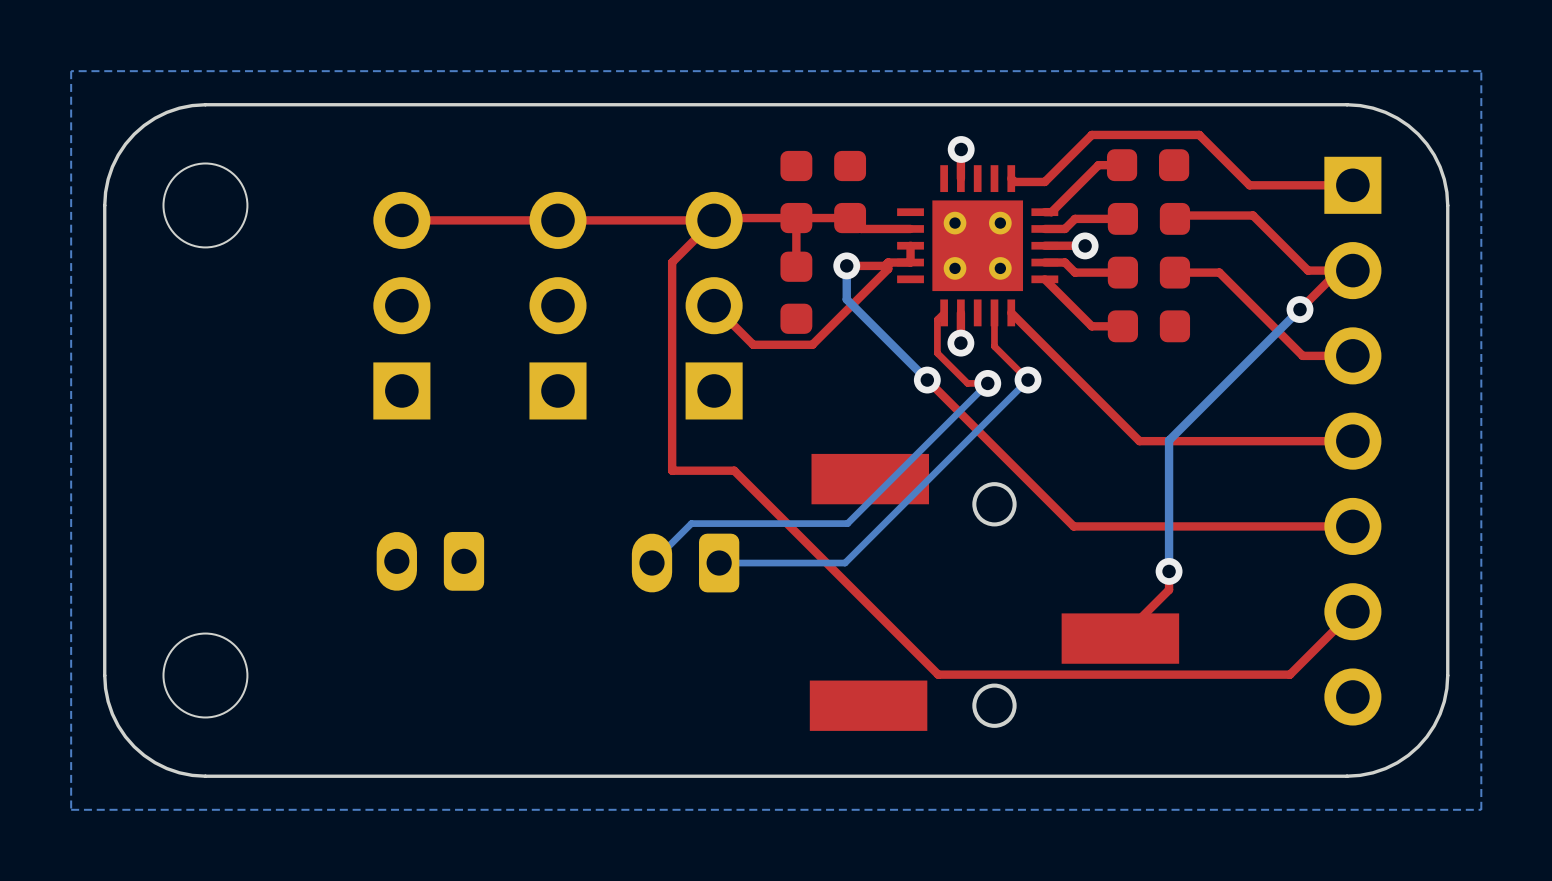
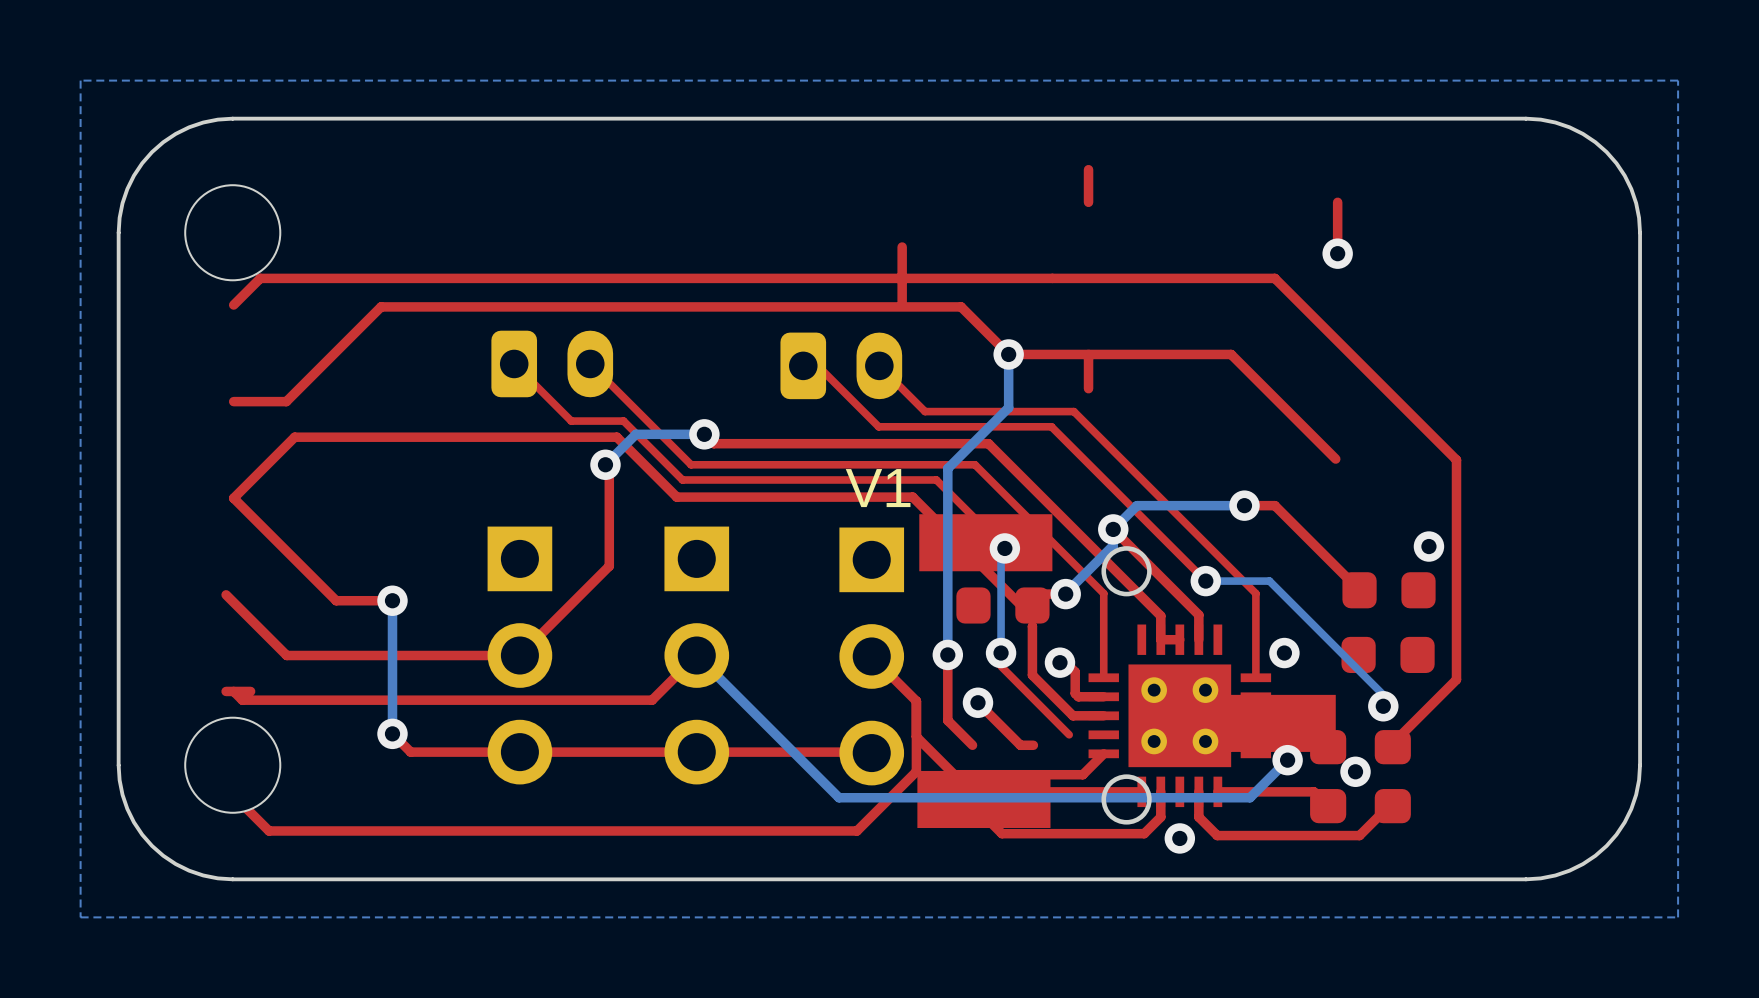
via: (961, 149) -> none
top track: (1122, 165) (1098, 165) (1051, 212) (1044, 212) -> none
part: (1148, 165) -> none
top track: (1011, 178) (1014, 181) (1044, 181) (1091, 134) (1199, 134) (1249, 185) (1352, 185) -> none
top track: none -> (1337, 202) (1337, 253)
part: (796, 192) -> none
part: (850, 192) -> none
top track: (1122, 218) (1075, 218) (1064, 228) (1044, 228) -> none
part: (1148, 218) -> none
top track: (1174, 218) (1178, 215) (1253, 215) (1308, 270) (1352, 270) -> none
top track: (714, 220) (401, 220) -> none
via: none -> (1337, 253)
top track: (910, 228) (861, 228) (850, 218) (716, 218) (672, 262) (672, 470) (734, 470) (938, 674) (1289, 674) (1352, 611) -> none
top track: (910, 245) (910, 262) (888, 262) -> none
part position: (977, 245) -> (1179, 715)
top track: none -> (1183, 278) (260, 278) (233, 305)
top track: none -> (1229, 278) (1274, 278) (1456, 460) (1456, 679) (1389, 747)
via: (1085, 245) -> none
top track: (888, 262) (884, 265) (846, 265) -> none
top track: (888, 262) (888, 268) (812, 344) (753, 344) (714, 305) -> none
top track: (1044, 262) (1064, 262) (1075, 272) (1122, 272) -> none
bottom track: (846, 265) (846, 299) (927, 380) -> none
via: (846, 265) -> none
top track: (1338, 270) (1300, 309) -> none
part: (1148, 272) -> none
top track: (1174, 272) (1219, 272) (1302, 355) (1352, 355) -> none
top track: (1044, 279) (1091, 326) (1122, 326) -> none
part: (796, 292) -> none
part: (401, 305) -> none
part: (558, 305) -> none
part: (714, 305) -> none
bottom track: (1300, 309) (1169, 440) (1169, 571) -> none
via: (1300, 309) -> none
bottom track: none -> (1008, 354) (1008, 407) (947, 468) (947, 654)
via: none -> (1008, 354)
top track: (944, 312) (937, 319) (937, 353) (967, 383) (987, 383) -> none
top track: (994, 312) (994, 346) (1028, 380) -> none
top track: (1011, 312) (1139, 441) (1352, 441) -> none
top track: none -> (514, 363) (571, 421) (623, 421) (682, 479) (936, 479) (1004, 548)
part: none -> (552, 363)
top track: none -> (590, 363) (691, 464) (974, 464) (1103, 593) (1103, 677)
top track: none -> (803, 365) (817, 365) (878, 426) (1051, 426) (1205, 581)
part: none -> (841, 365)
top track: none -> (879, 365) (925, 411) (1073, 411) (1255, 593) (1255, 677)
part: (1148, 326) -> none
via: (960, 343) -> none
top track: none -> (233, 401) (286, 401) (381, 306) (961, 306) (1008, 354) (1231, 354) (1335, 459)
top track: (927, 380) (1073, 526) (1352, 526) -> none
via: (927, 380) -> none
bottom track: (1028, 380) (845, 563) (719, 563) -> none
via: (1028, 380) -> none
top track: none -> (704, 434) (713, 443) (988, 443) (1160, 615) (1160, 639) (1179, 639)
bottom track: none -> (704, 434) (635, 434) (605, 464)
via: none -> (704, 434)
bottom track: (987, 383) (887, 484) -> none
via: (987, 383) -> none
top track: none -> (605, 464) (609, 468) (609, 566) (519, 655) (286, 655) (226, 594)
via: none -> (605, 464)
text: none -> V1 (878, 488)
part: (1352, 441) -> none
top track: none -> (1244, 505) (1274, 505) (1359, 590)
bottom track: none -> (1244, 505) (1137, 505) (1113, 529) (1113, 545) (1065, 594)
via: none -> (1244, 505)
top track: none -> (1113, 529) (1198, 615) (1198, 639)
via: none -> (1113, 529)
via: none -> (1428, 546)
via: none -> (1004, 548)
bottom track: (883, 487) (847, 523) (691, 523) (652, 563) -> (1001, 552) (1001, 653)
bottom track: none -> (1205, 581) (1269, 581) (1383, 694) (1383, 706)
via: none -> (1205, 581)
part: none -> (1389, 590)
top track: none -> (1065, 594) (1043, 594) (1032, 605) (1021, 605) (912, 497) (676, 497) (616, 437) (294, 437) (233, 498) (336, 600) (392, 600)
via: none -> (1065, 594)
bottom track: none -> (392, 600) (392, 733)
via: none -> (392, 600)
part footprint: [376, 531, 485, 591] -> [487, 526, 553, 785]
part: none -> (1002, 605)
top track: none -> (1032, 626) (1032, 675) (1073, 715) (1103, 715)
part: (685, 563) -> none
top track: (1169, 571) (1169, 589) (1120, 638) -> none
via position: (1169, 571) -> (1284, 653)
via: none -> (1001, 653)
top track: none -> (696, 655) (652, 700) (242, 700) (233, 691)
bottom track: none -> (696, 655) (839, 797) (1250, 797) (1287, 760)
part: none -> (696, 655)
top track: none -> (947, 654) (947, 720) (972, 745)
via: none -> (947, 654)
part: none -> (1388, 654)
top track: none -> (871, 656) (916, 701) (916, 771) (857, 830) (269, 830) (226, 788)
part: none -> (871, 656)
top track: none -> (1059, 662) (1065, 662) (1075, 672) (1075, 693) (1078, 696) (1103, 696)
via: none -> (1059, 662)
top track: none -> (1001, 666) (1069, 734)
top track: none -> (250, 691) (226, 691)
top track: none -> (977, 702) (1020, 745) (1033, 745)
via: none -> (977, 702)
via: none -> (1383, 706)
top track: none -> (392, 733) (410, 752) (871, 753)
via: none -> (392, 733)
top track: none -> (916, 736) (954, 774) (1082, 774) (1103, 753)
via: none -> (1287, 760)
via: none -> (1355, 771)
part: none -> (1328, 776)
part: none -> (1392, 776)
top track: none -> (1141, 791) (1045, 791) (1033, 804)
top track: none -> (1160, 791) (1160, 817) (1144, 833) (1001, 833) (972, 804)
top track: none -> (1198, 791) (1198, 817) (1217, 835) (1359, 835) (1389, 806)
top track: none -> (1217, 791) (1313, 791) (1328, 806)
via: none -> (1179, 838)

